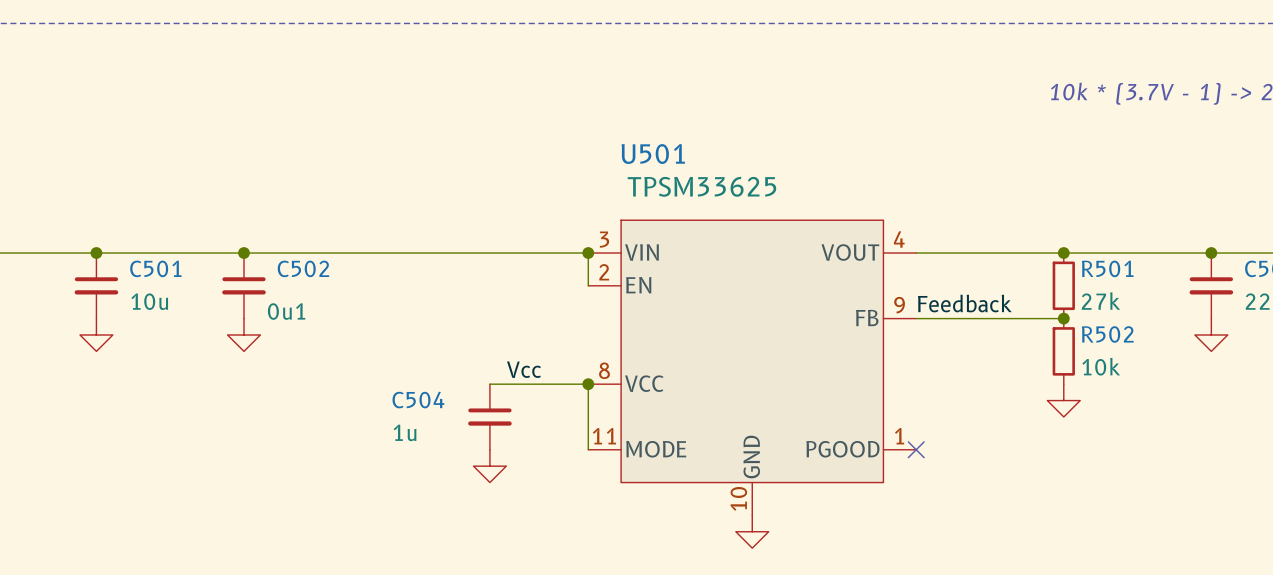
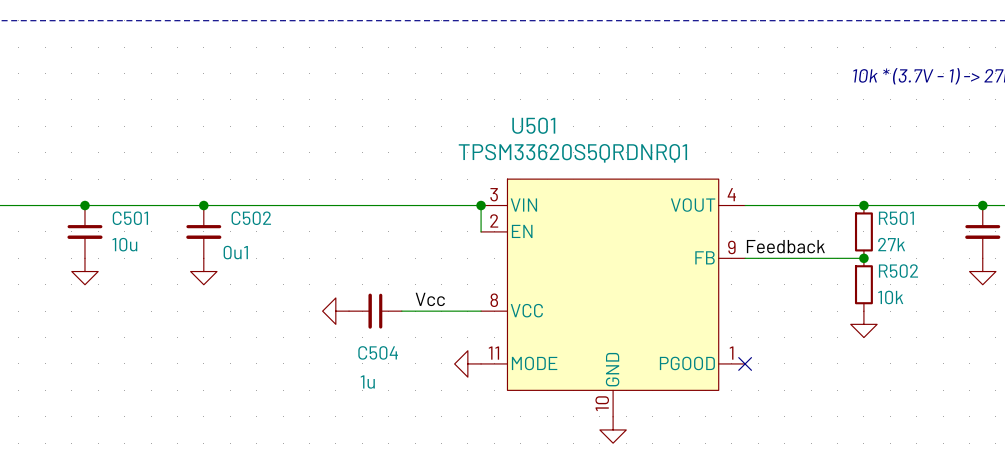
U501 value: TPSM33625 (701, 186) -> TPSM33620S5QRDNRQ1 (572, 153)
power symbol: none -> (335, 311)
wire: (588, 384) (588, 449) -> none
junction: (588, 384) -> none
C504 name position: C504 (418, 400) -> C504 (378, 352)
C504 position: (489, 416) -> (375, 311)
C504 rotation: 0° (489, 417) -> 90° clockwise (375, 311)
C504 value position: 1u (405, 432) -> 1u (367, 382)
power symbol: none -> (467, 363)
power symbol: (489, 466) -> none

